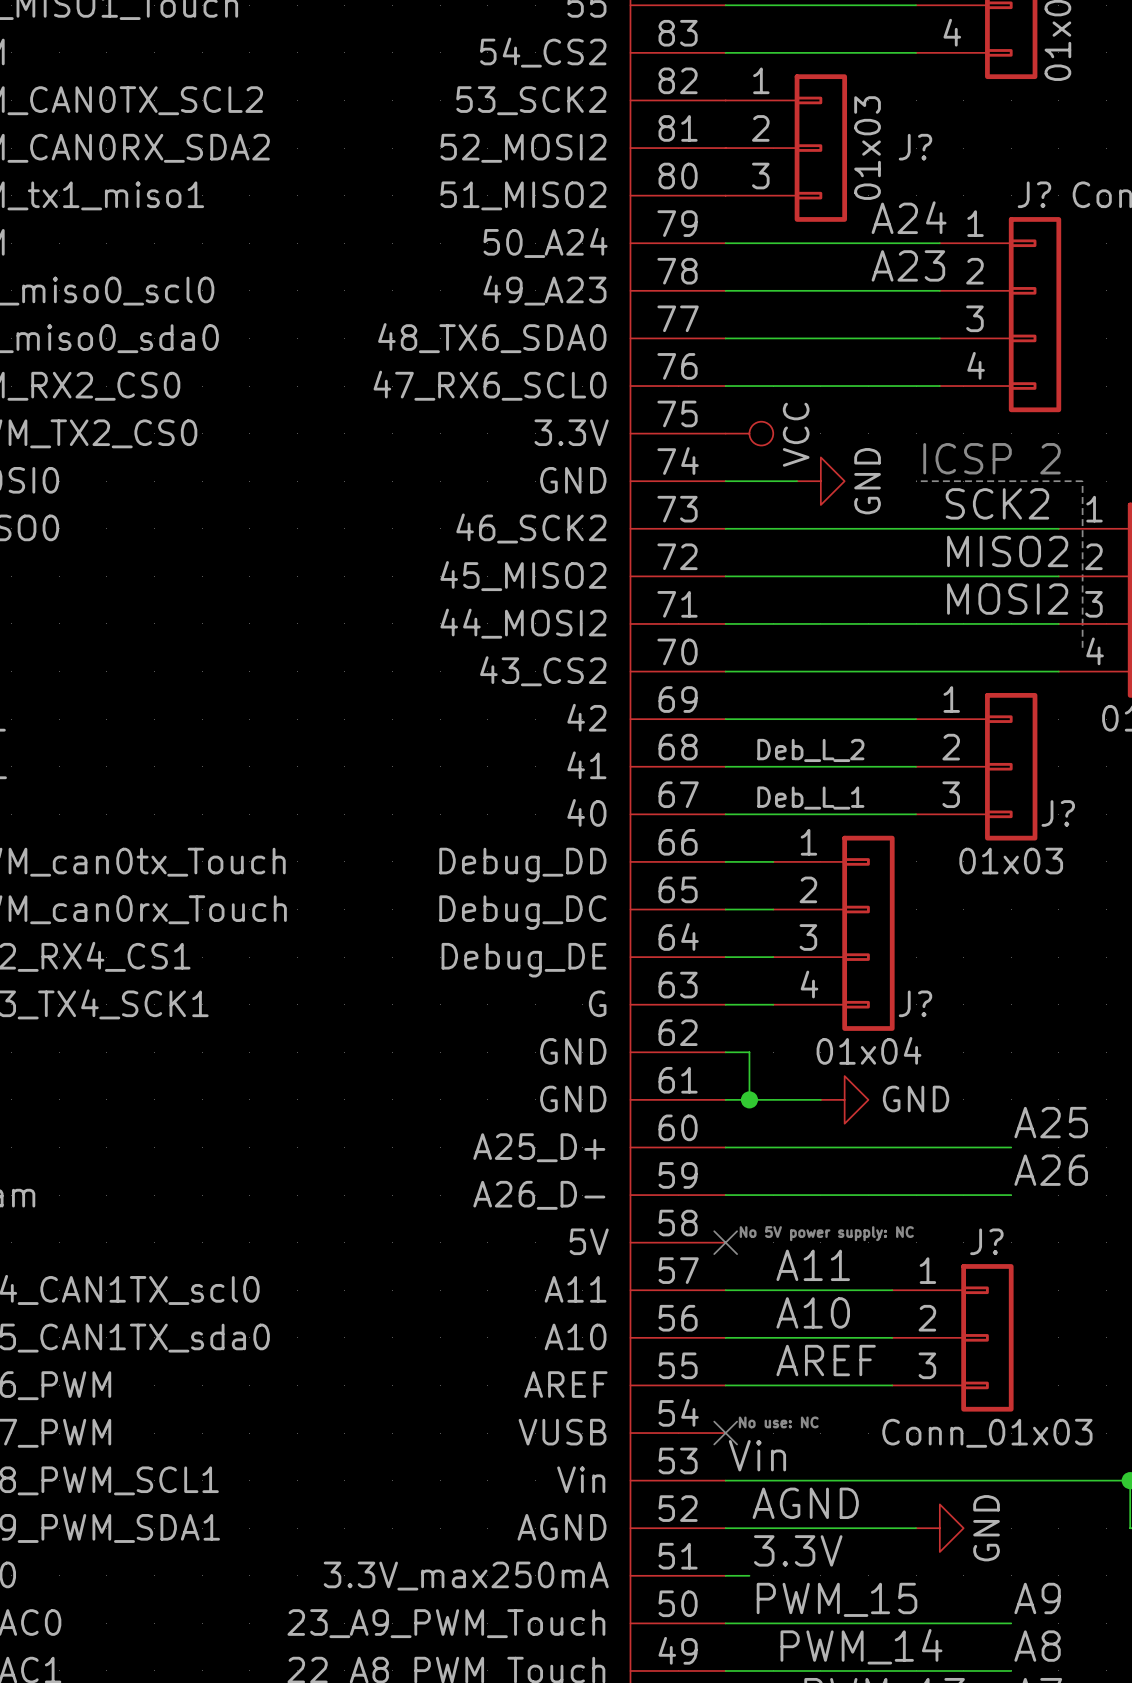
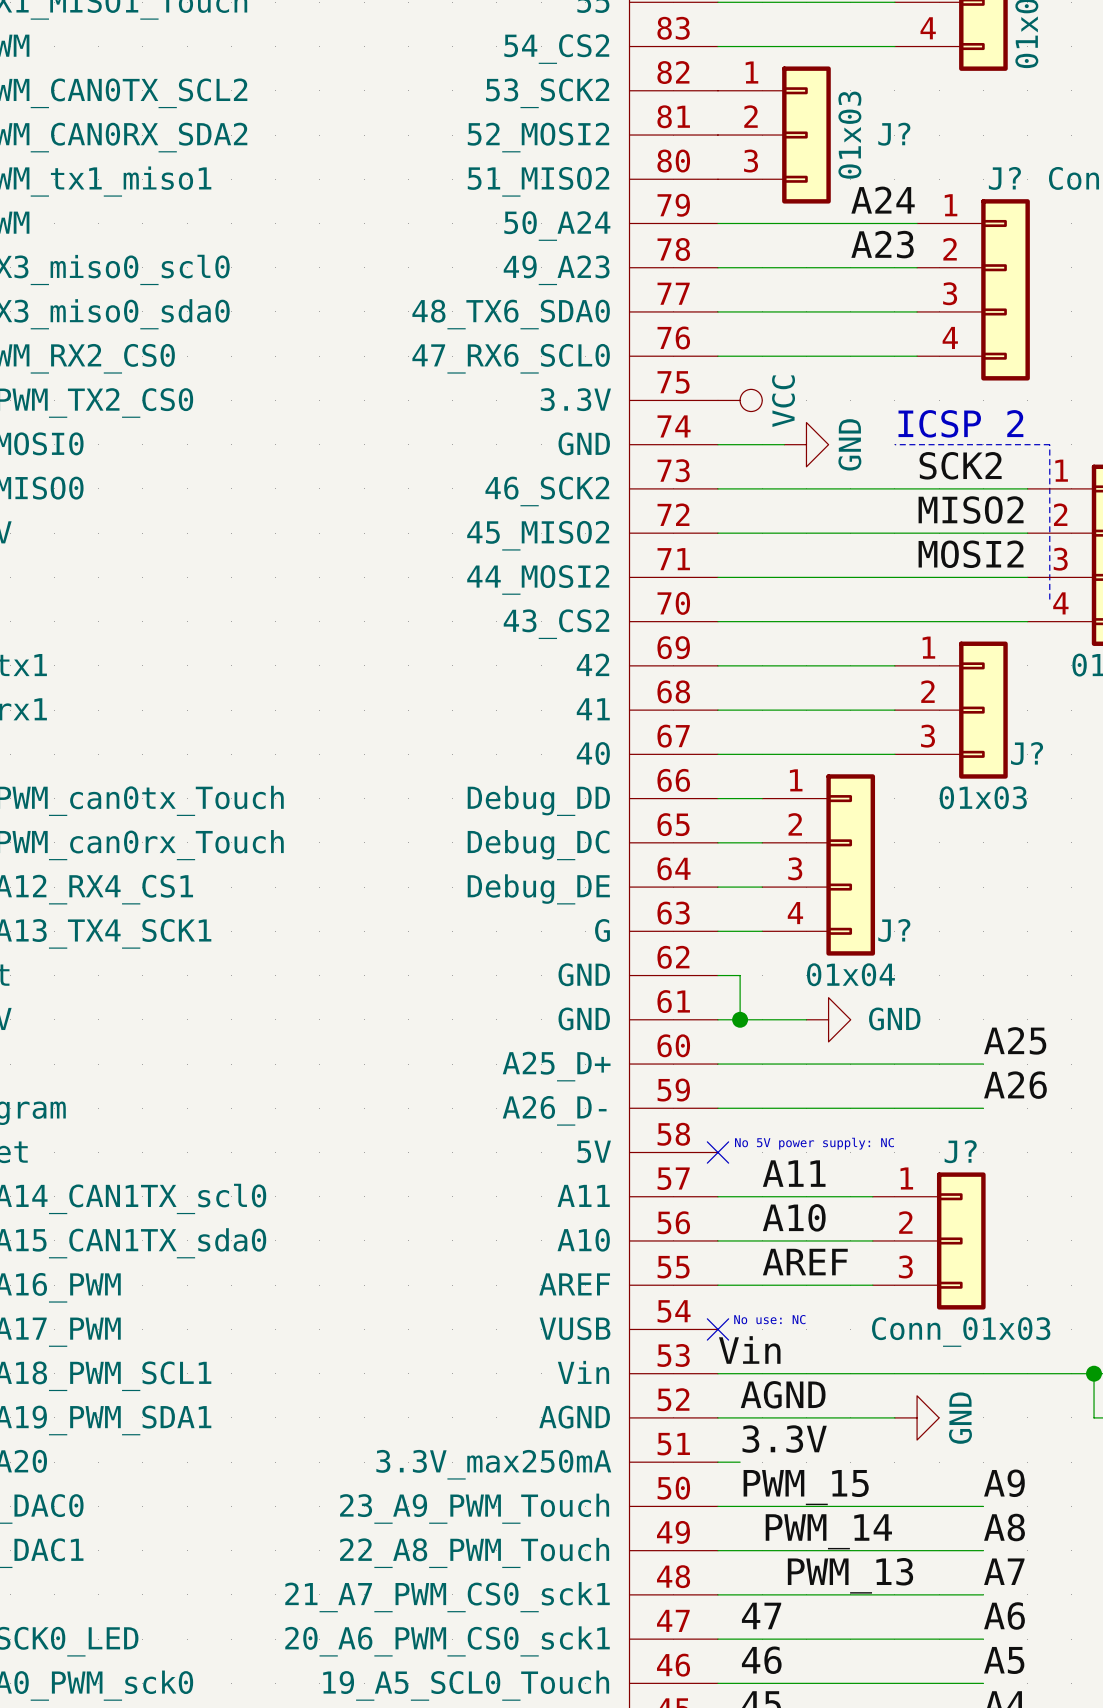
label: Deb_L_2 (810, 750) -> none
label: Deb_L_1 (810, 798) -> none

